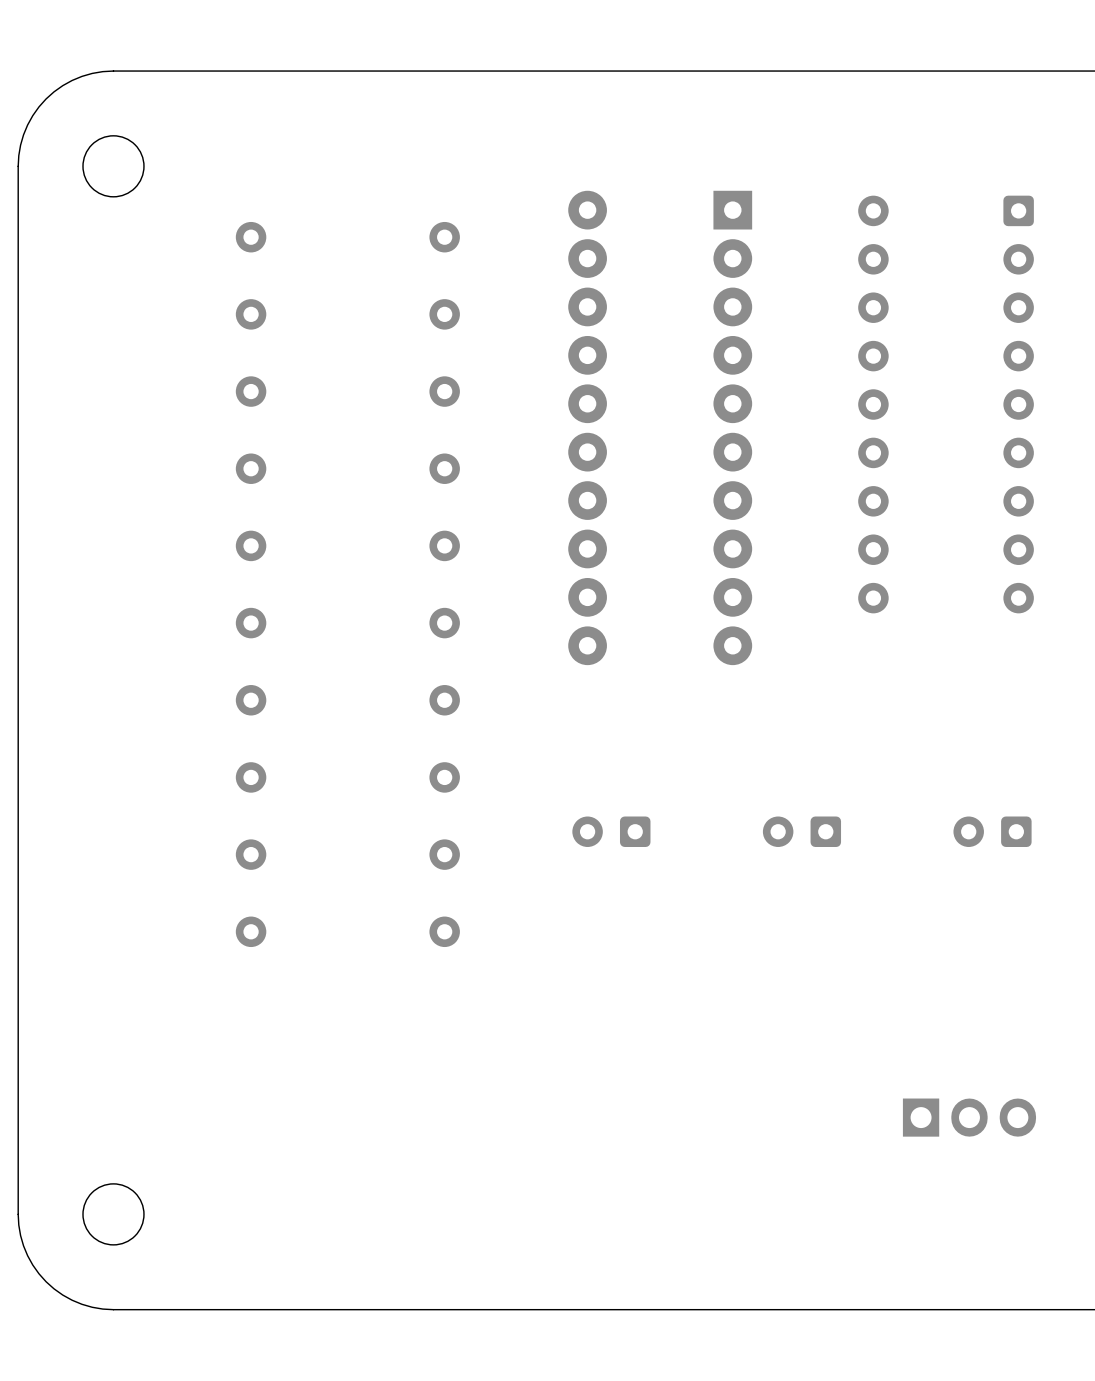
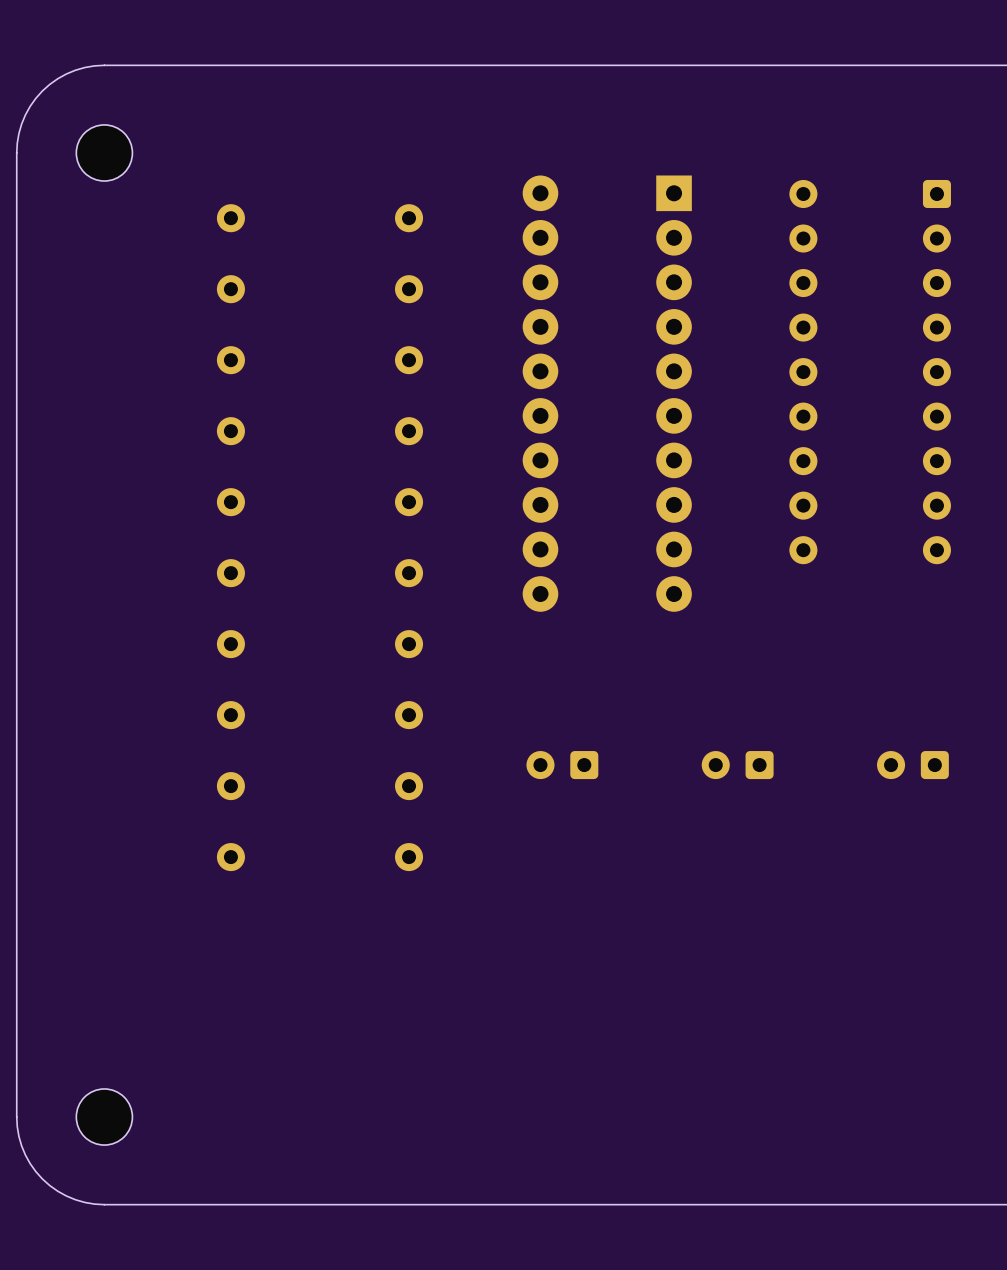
part: (969, 1117) -> none

